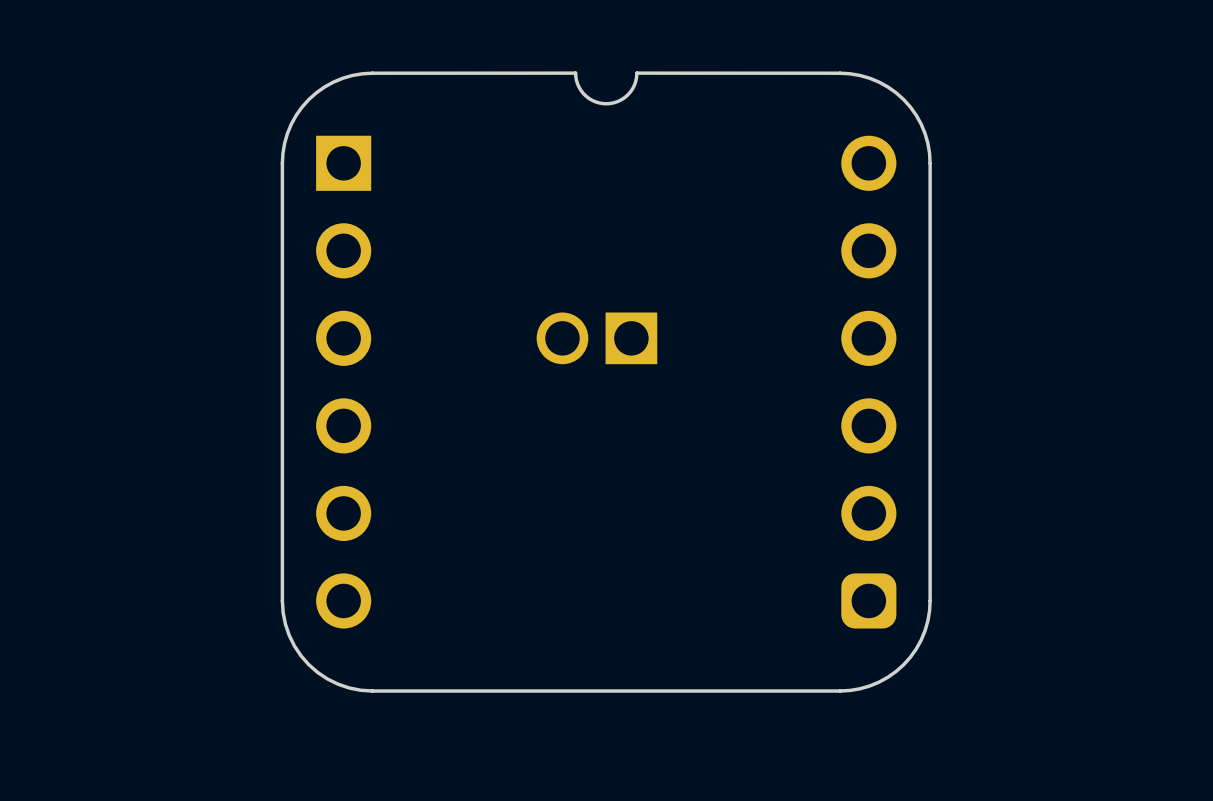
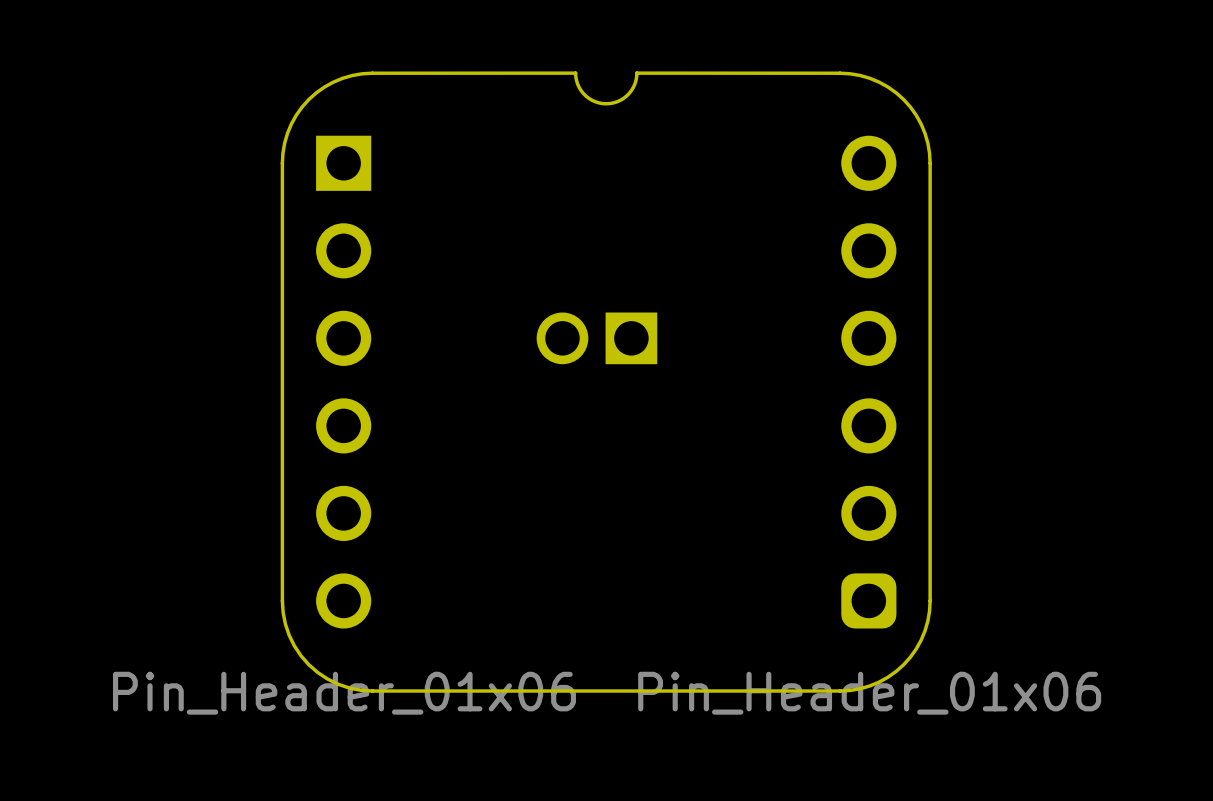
drawing: none -> [112, 671, 1102, 715]

